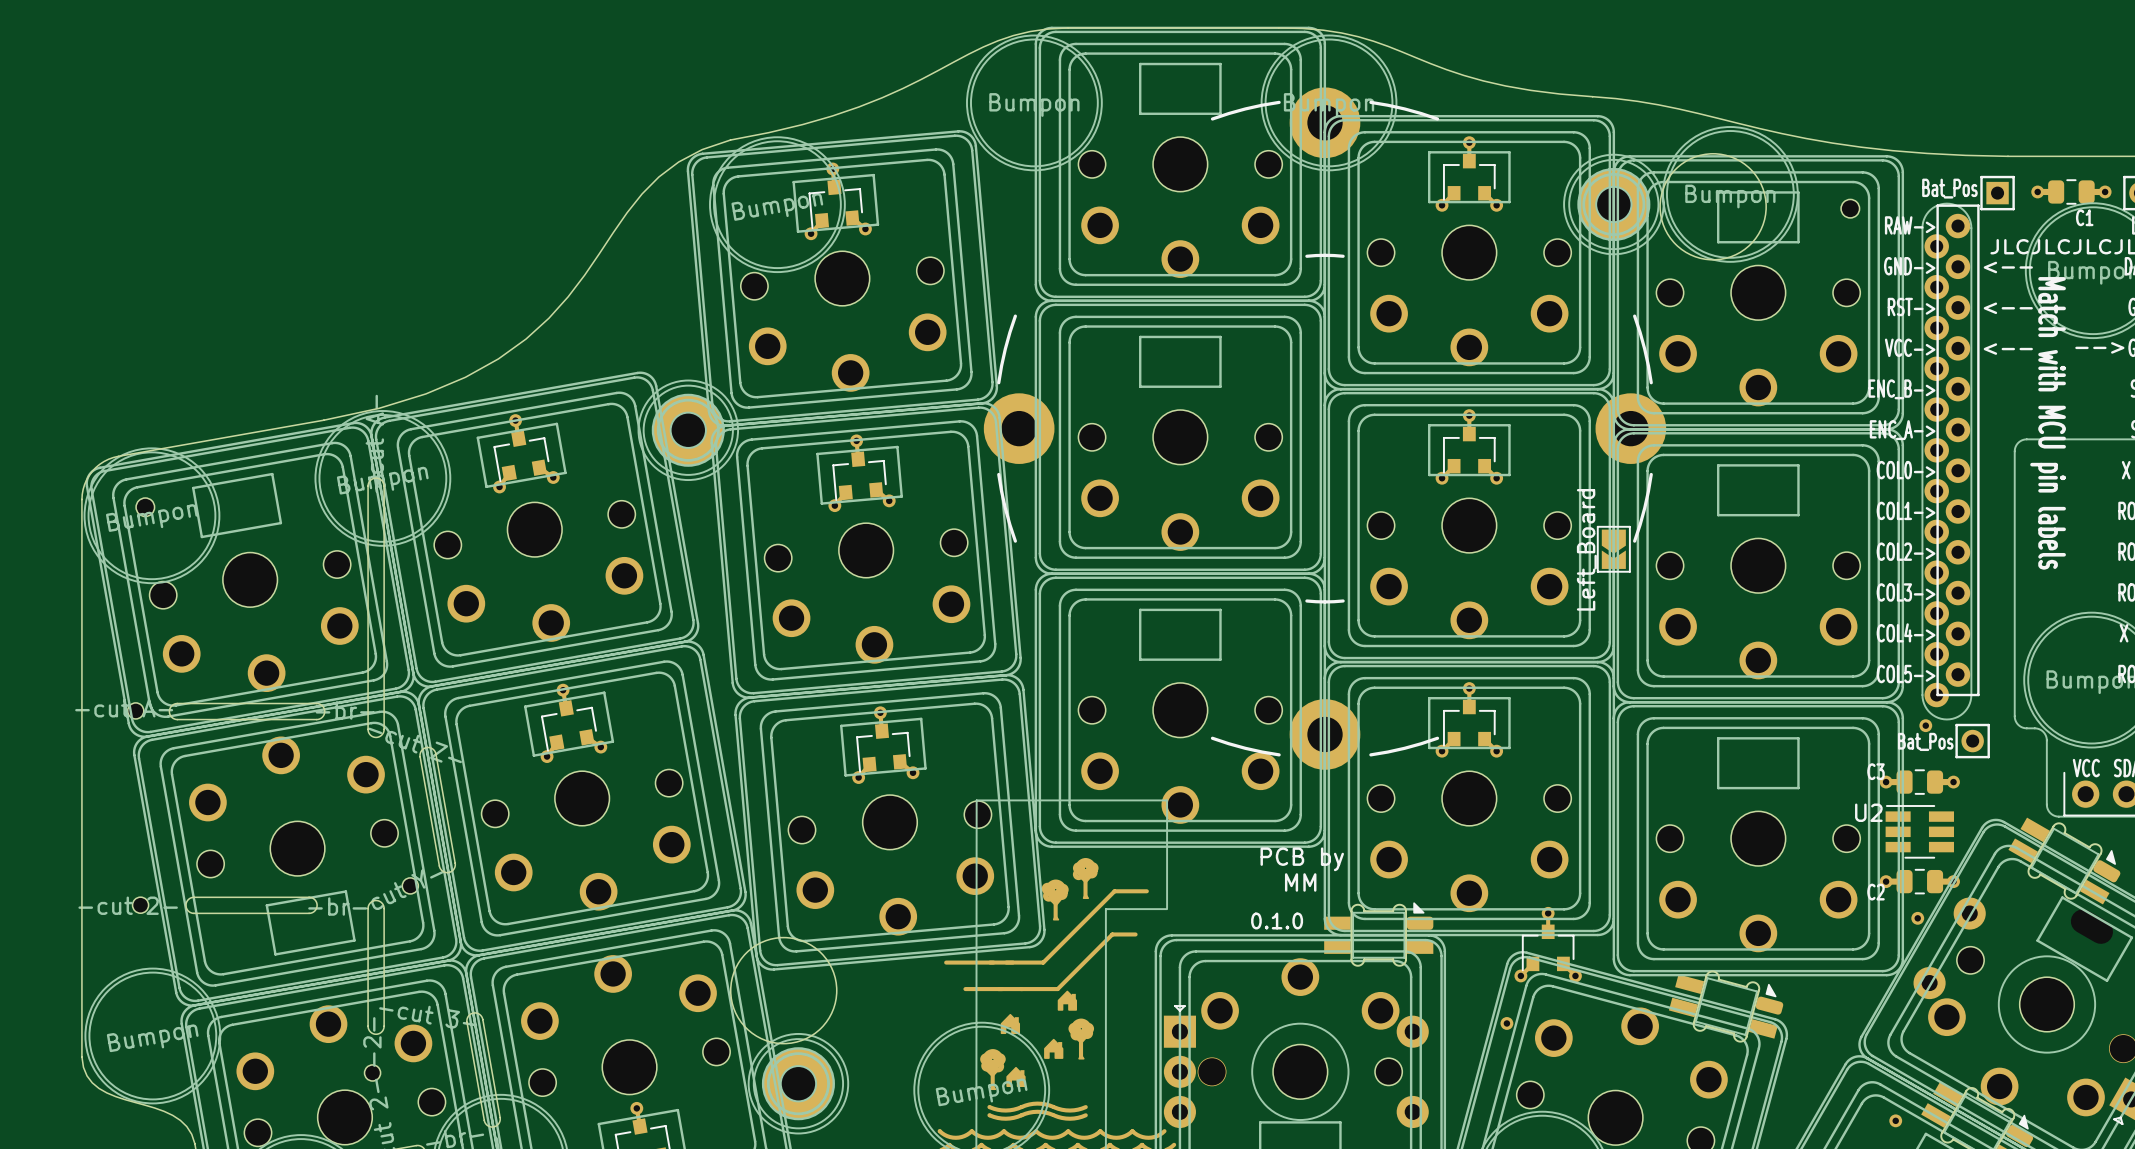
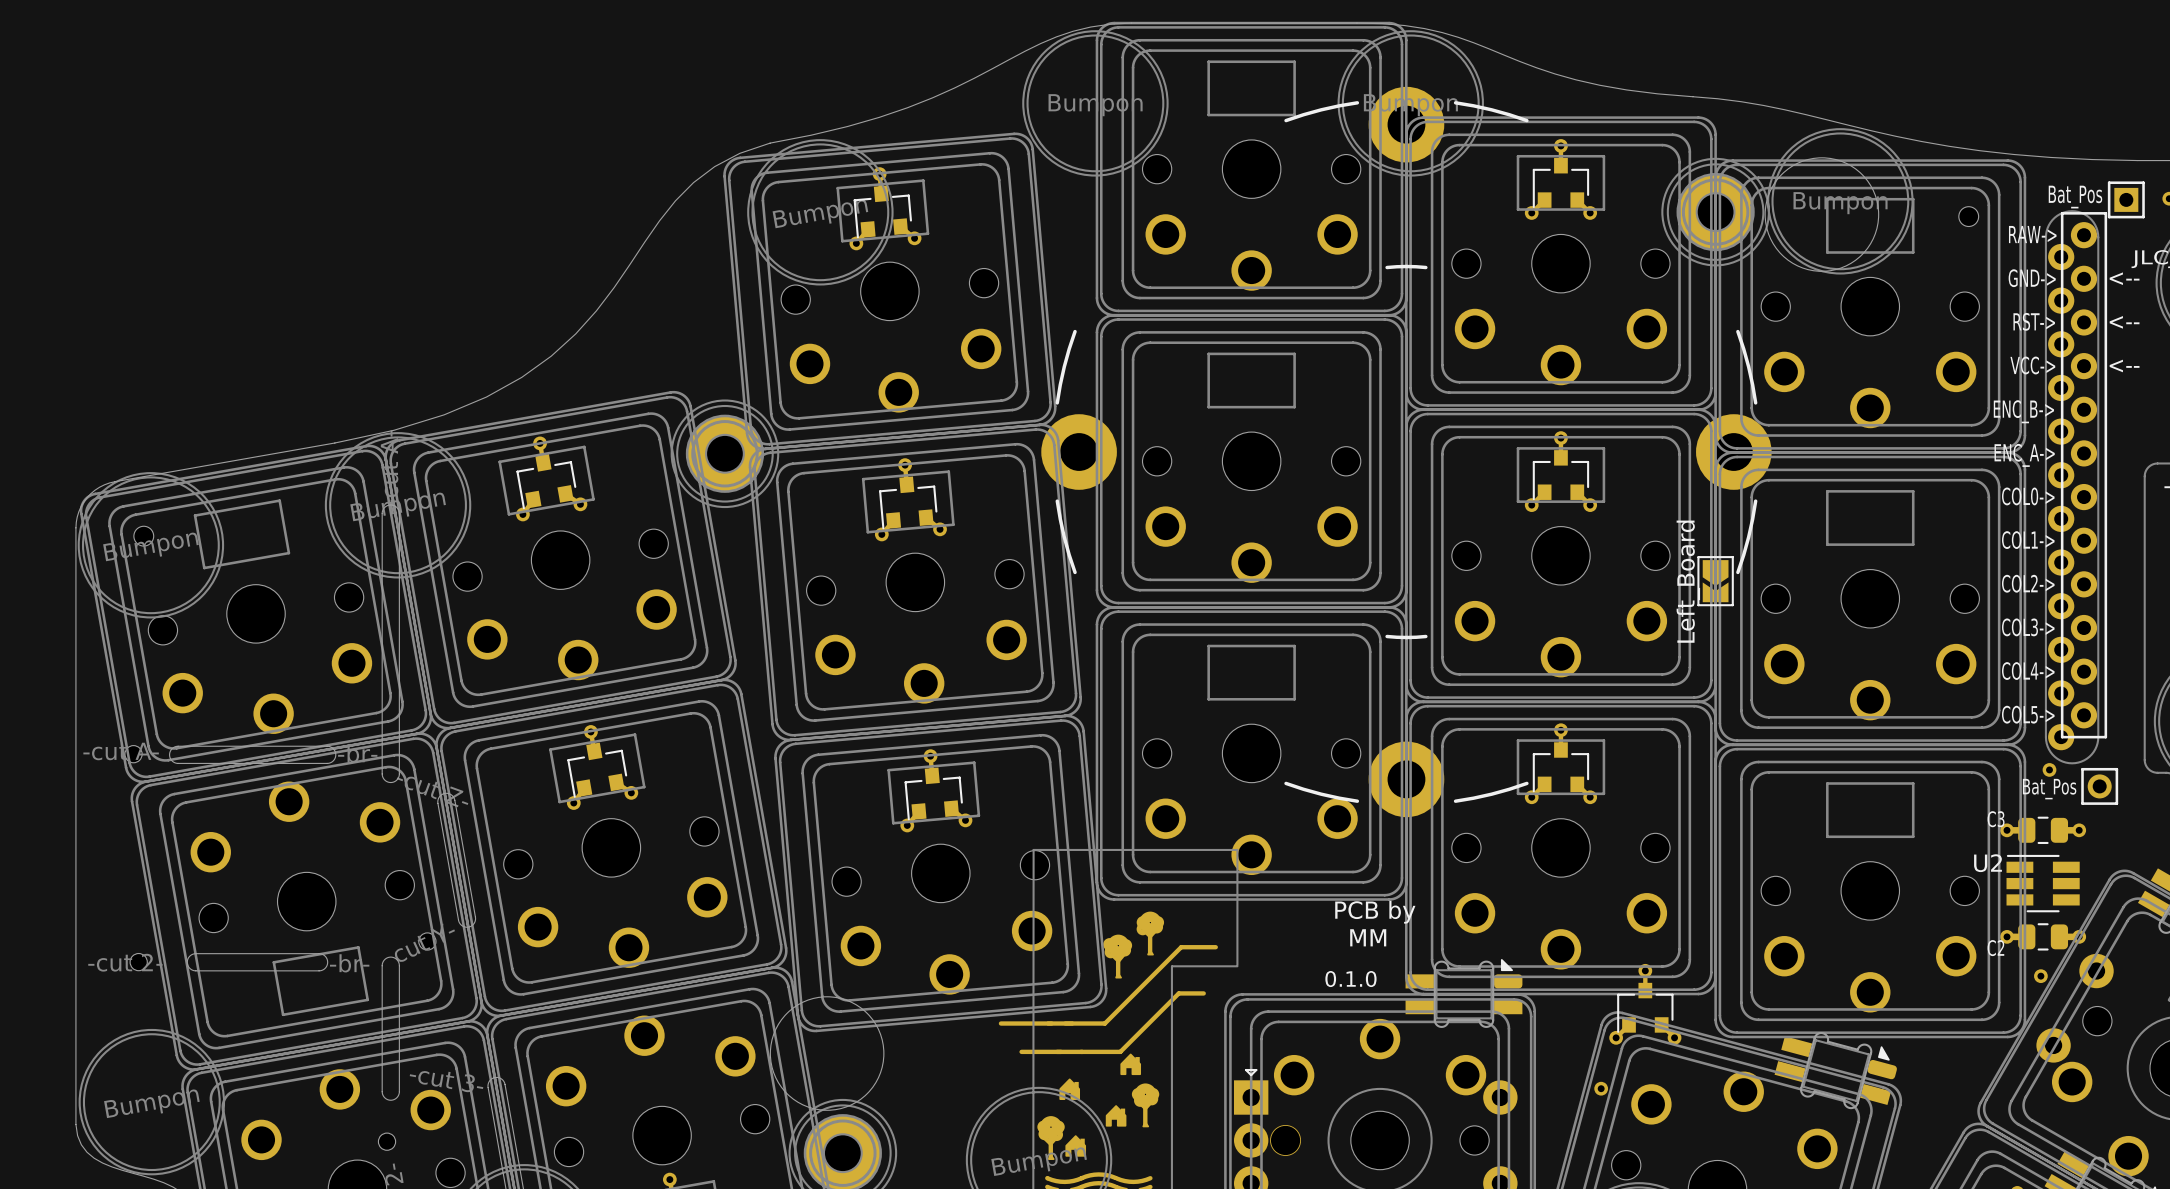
text: -2- (372, 1042) -> none

